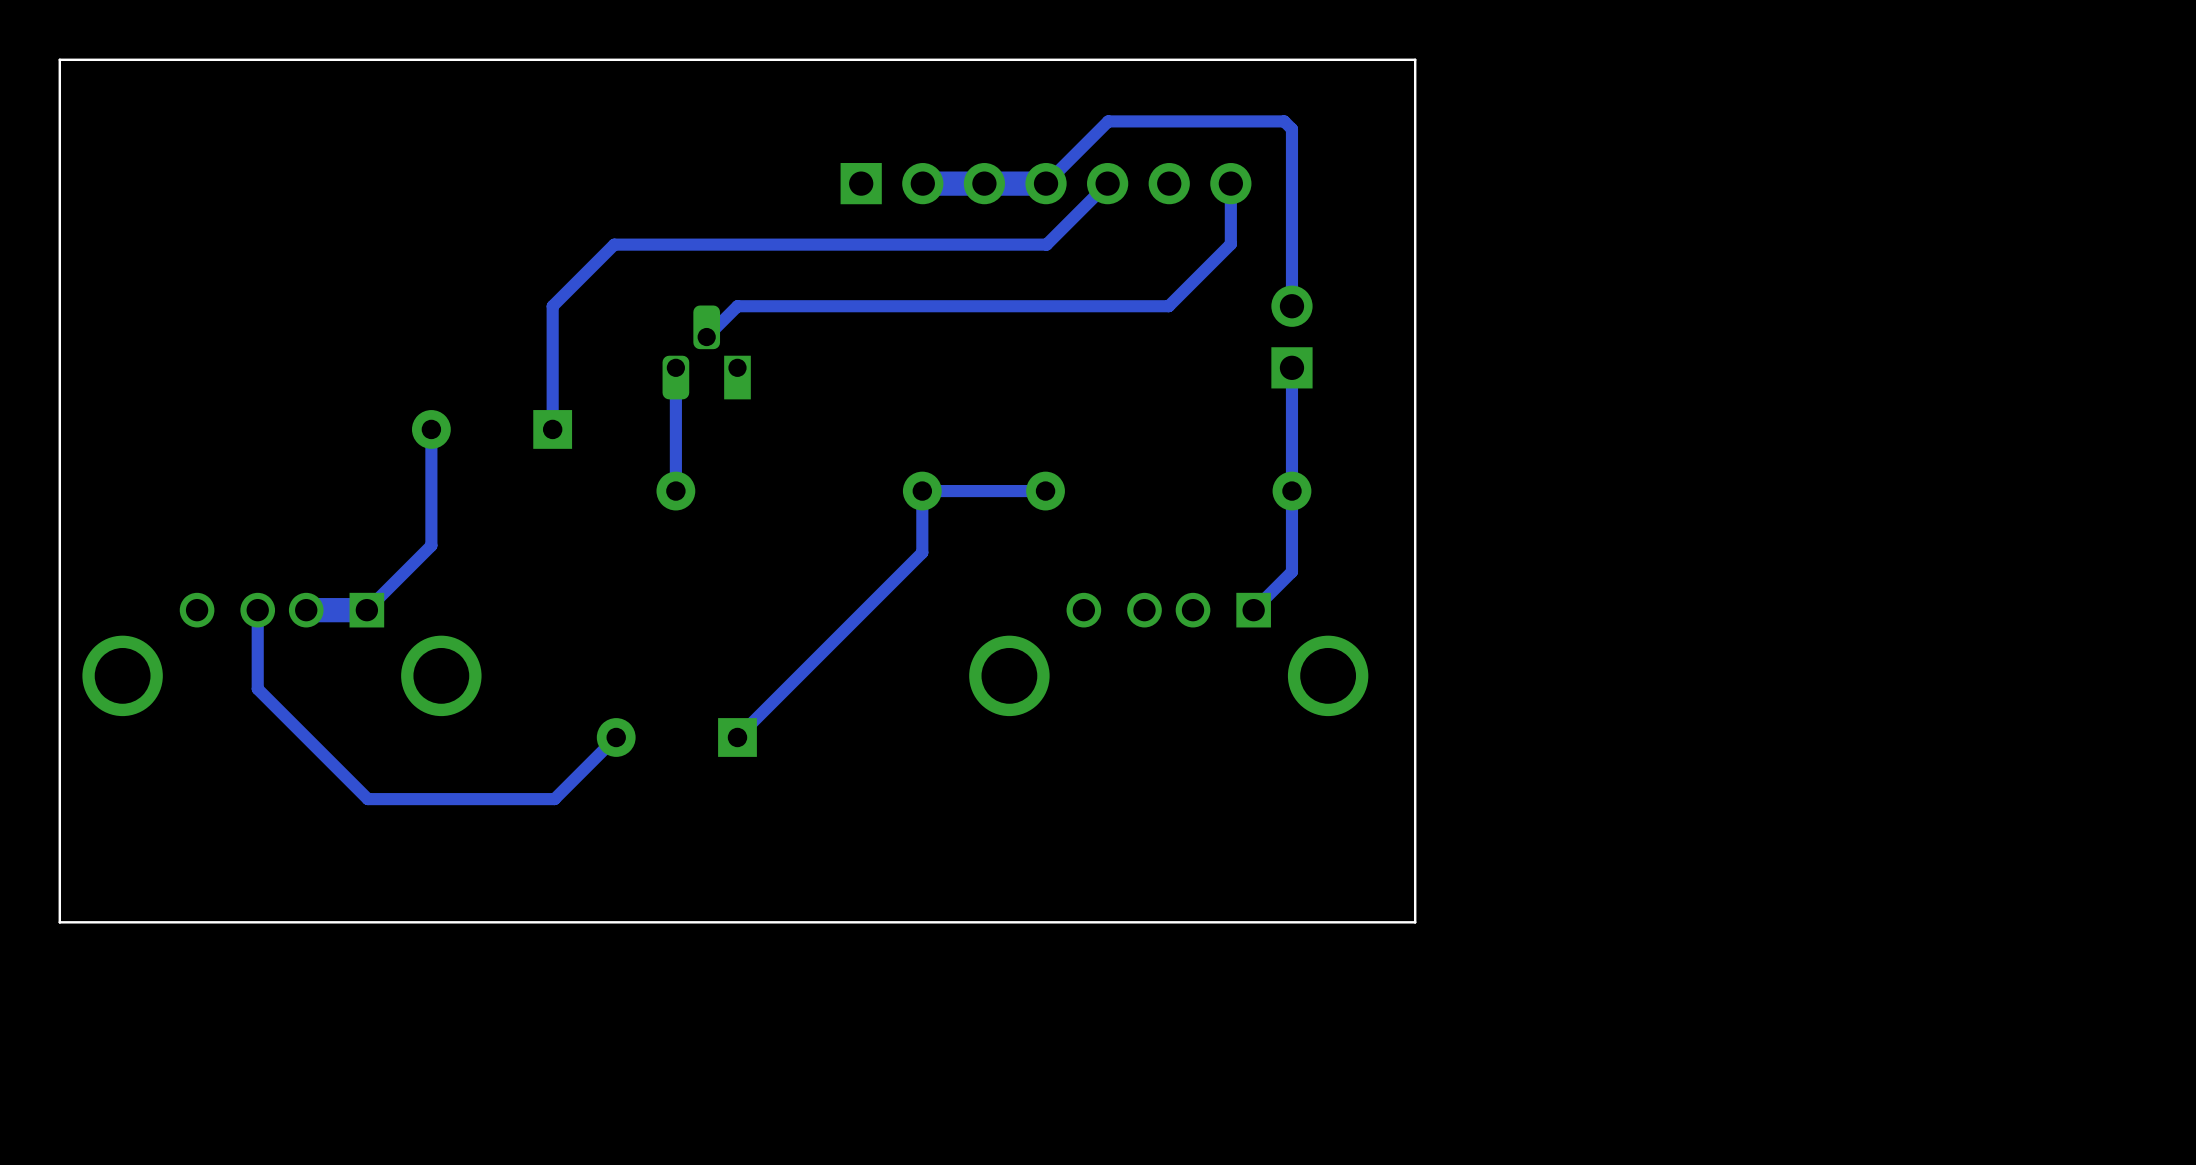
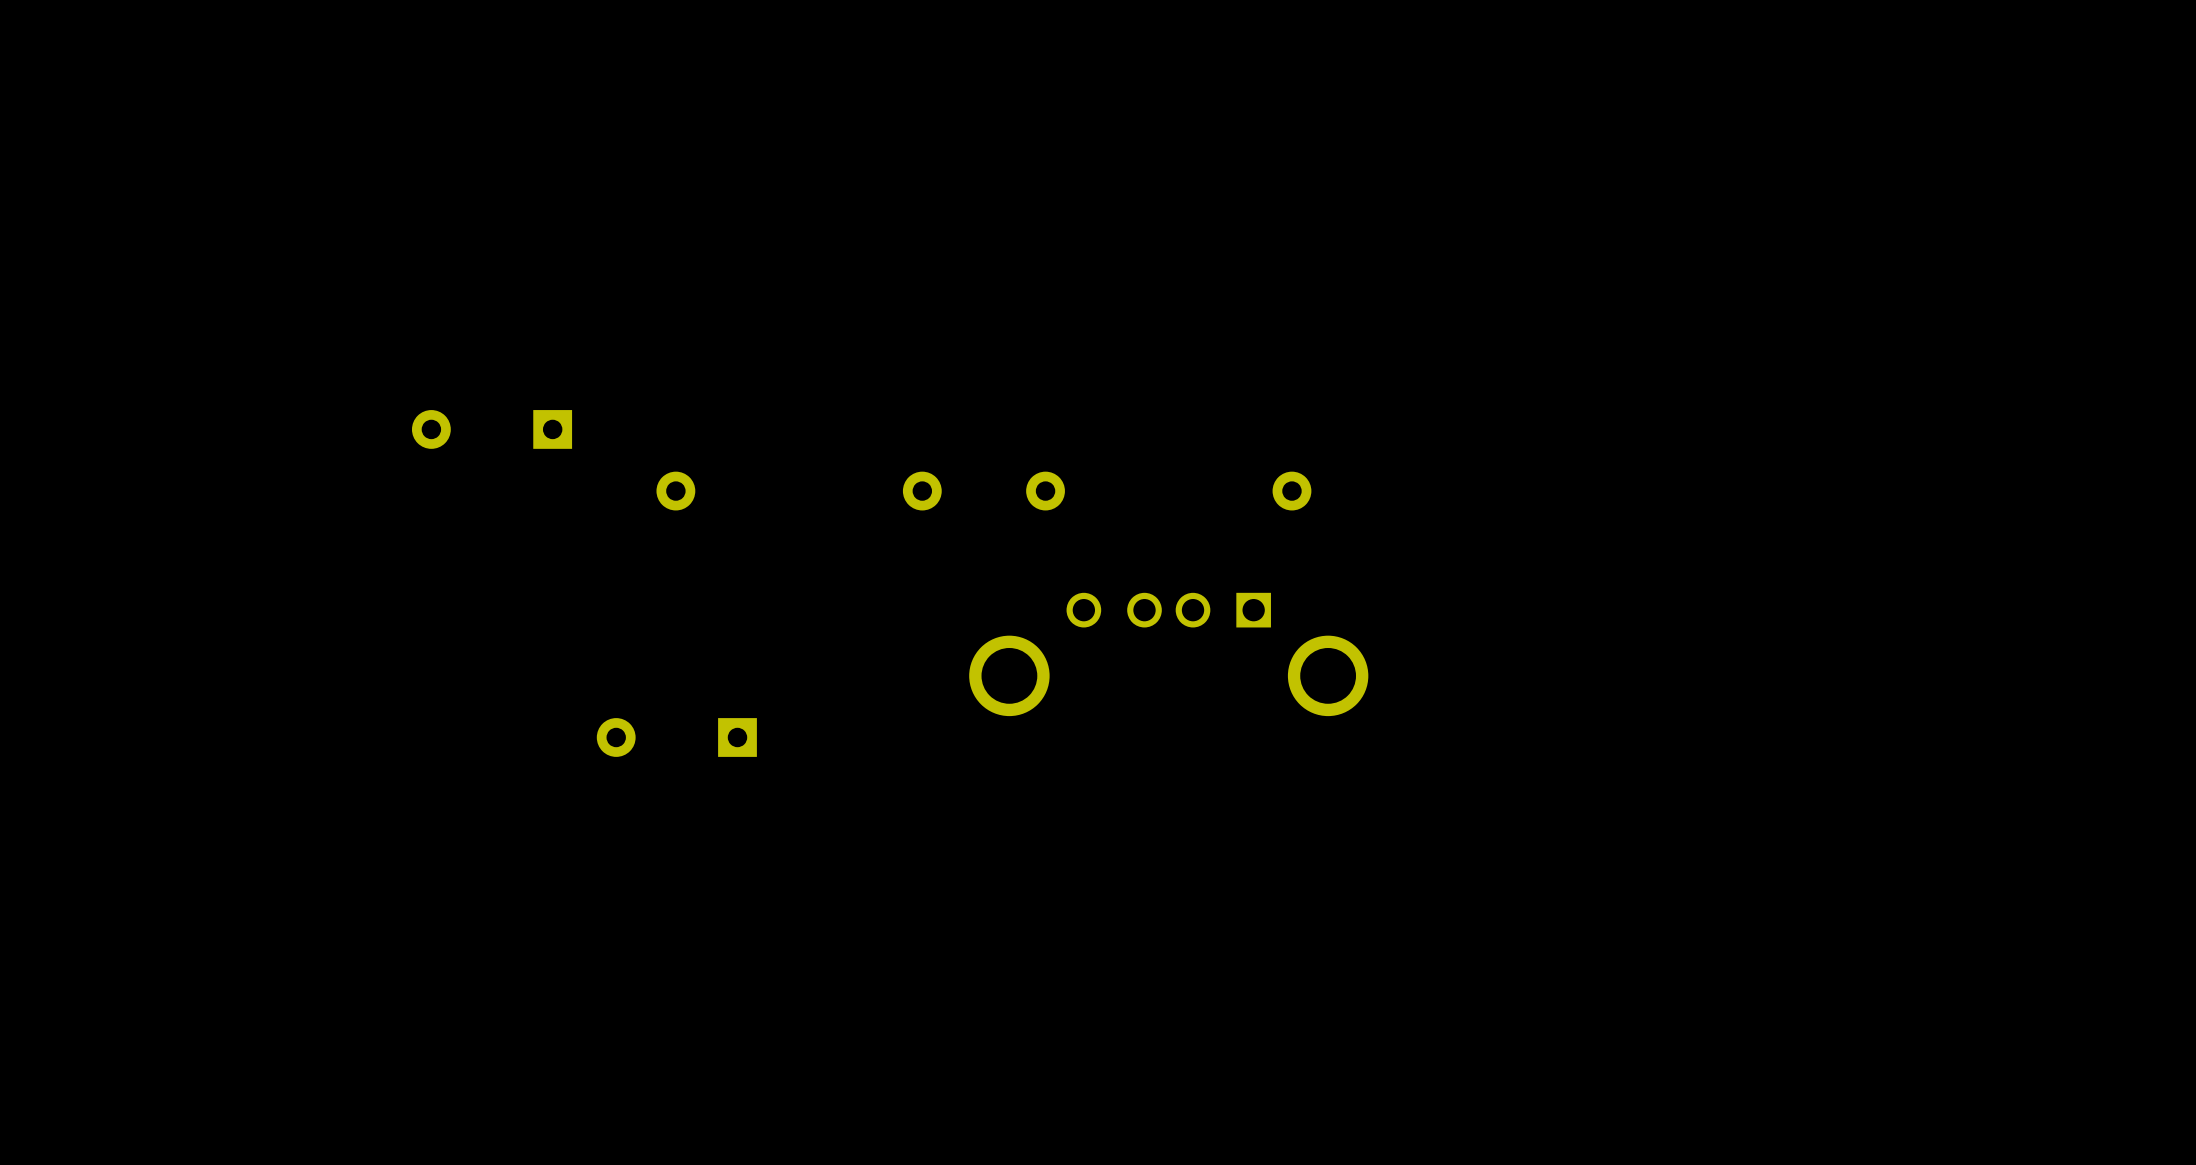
board edge: (1415, 59) (59, 59) (59, 922) (1415, 922) (1415, 59) -> none
track: (922, 183) (1046, 183) (1108, 121) (1284, 121) (1291, 129) (1291, 306) -> none
part: (1046, 183) -> none
track: (1107, 183) (1046, 244) (614, 244) (552, 306) (552, 429) -> none
track: (1230, 183) (1230, 244) (1168, 306) (737, 306) (706, 337) -> none
part: (1291, 337) -> none
part: (706, 352) -> none
track: (675, 367) (675, 491) -> none
track: (1291, 367) (1291, 571) (1253, 610) -> none
track: (431, 429) (431, 545) (366, 610) (306, 610) -> none
track: (1045, 491) (922, 491) (922, 552) (737, 737) -> none
track: (257, 610) (257, 688) (367, 799) (554, 799) (616, 737) -> none
part: (281, 654) -> none

